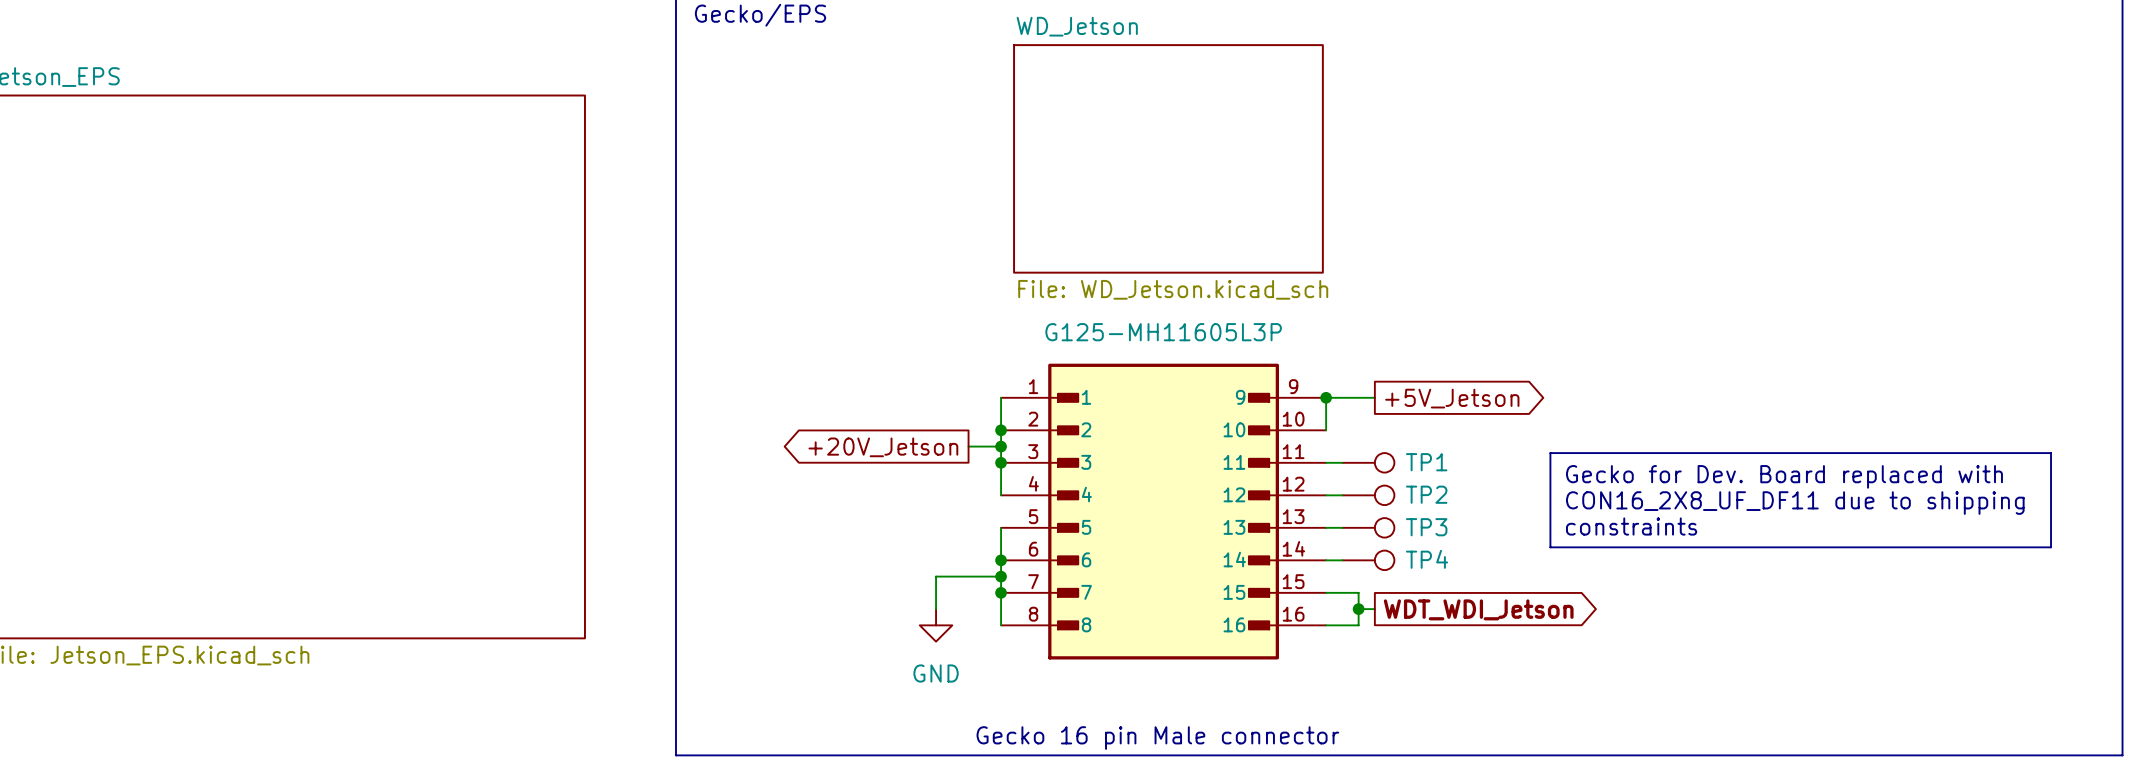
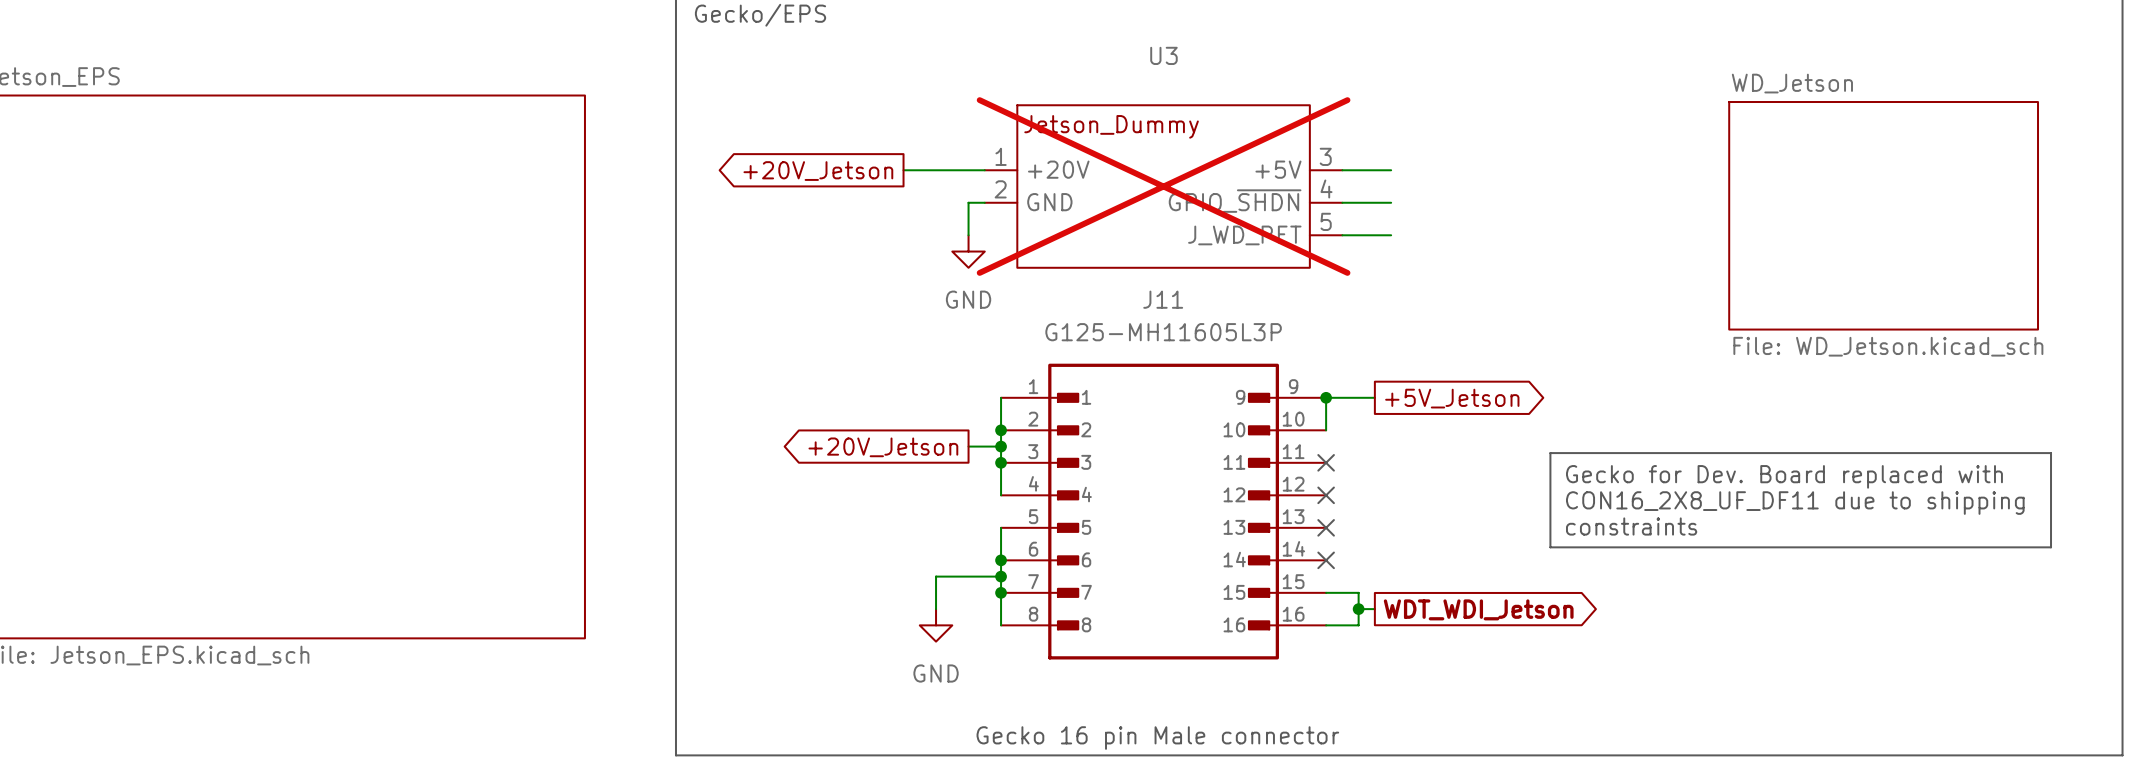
sheet WD_Jetson: File: WD_Jetson.kicad_sch (1168, 158) -> none
wire: none -> (903, 170) (984, 170)
wire: none -> (1342, 170) (1391, 170)
global label: none -> +20V_Jetson (818, 171)
U3: none -> (1163, 186)
wire: none -> (984, 202) (968, 202) (968, 235)
wire: none -> (1342, 202) (1391, 202)
sheet WD_Jetson: none -> File: WD_Jetson.kicad_sch (1883, 215)
wire: none -> (1342, 235) (1391, 235)
power symbol: none -> GND (968, 251)
J11 name: none -> J11 (1163, 299)
wire: (1326, 462) (1342, 462) -> none
no-connect mark: none -> (1326, 462)
TP1: (1368, 462) -> none
wire: (1326, 495) (1342, 495) -> none
no-connect mark: none -> (1326, 495)
TP2: (1368, 495) -> none
wire: (1326, 527) (1342, 527) -> none
no-connect mark: none -> (1326, 527)
TP3: (1368, 527) -> none
wire: (1326, 560) (1342, 560) -> none
no-connect mark: none -> (1326, 560)
TP4: (1368, 560) -> none

